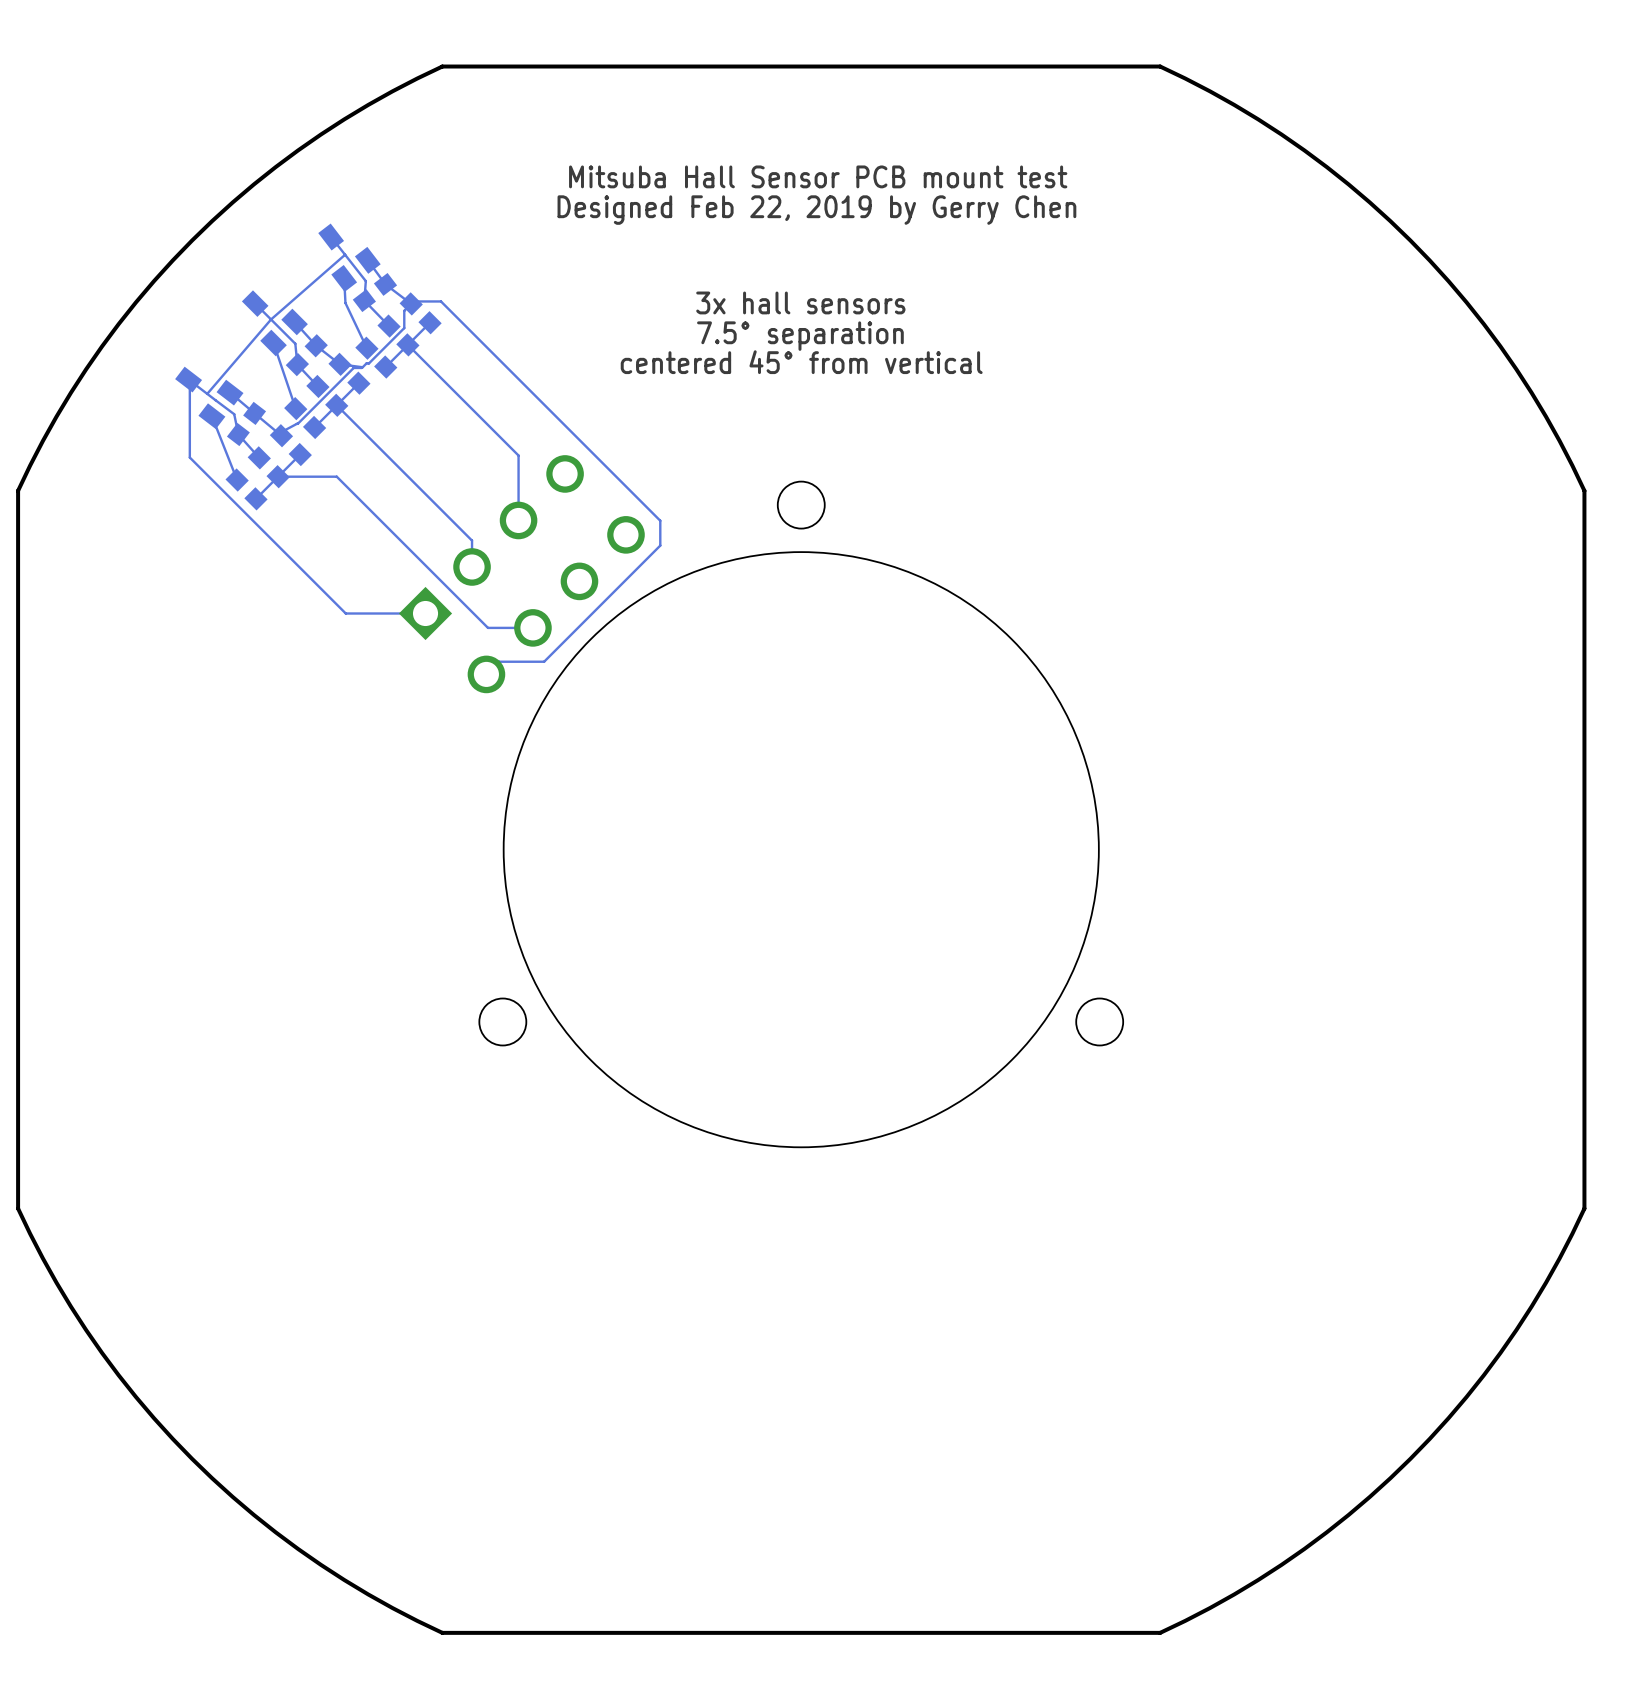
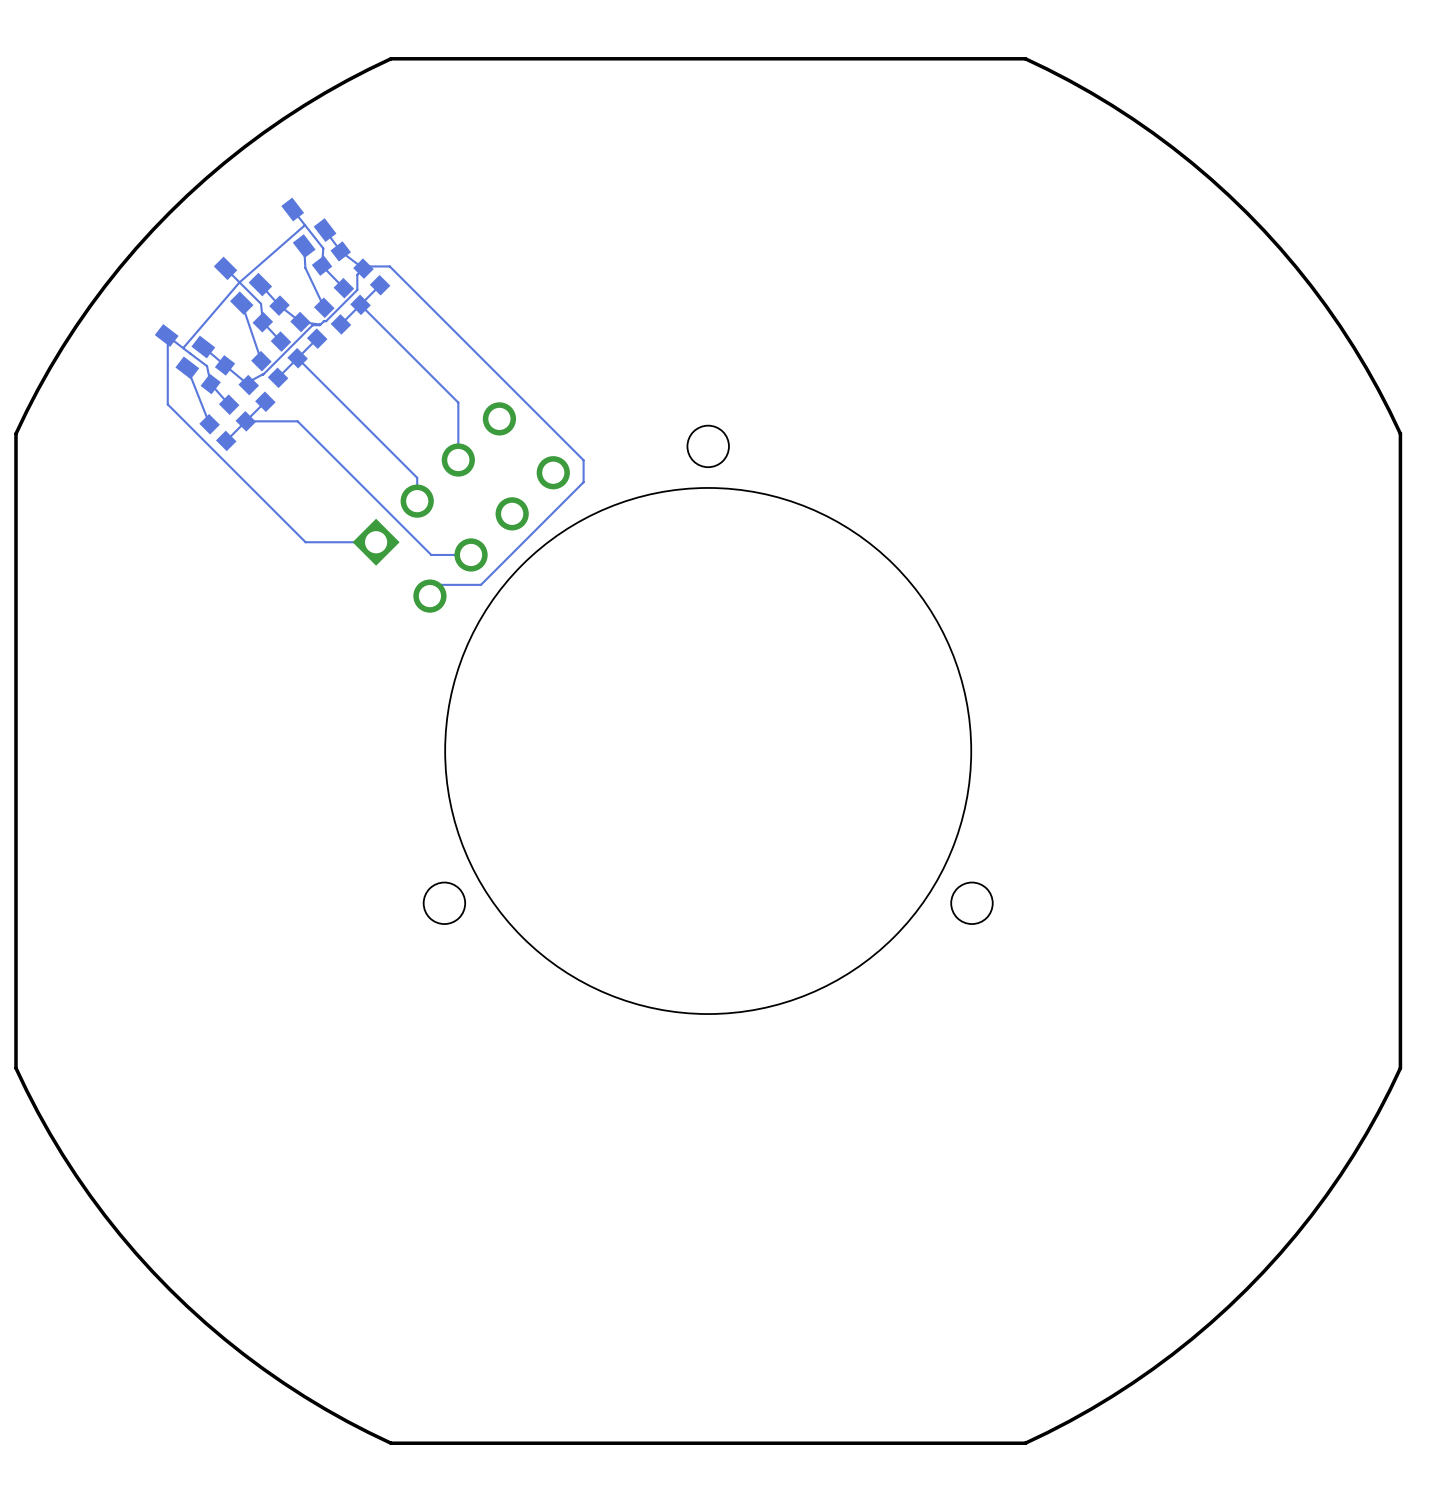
text: Mitsuba Hall Sensor PCB mount test (818, 176) -> none
text: Designed Feb 22, 2019 by Gerry Chen (816, 210) -> none
text: 3x hall sensors (800, 302) -> none
text: 7.5° separation (800, 336) -> none
text: centered 45° from vertical (801, 362) -> none

